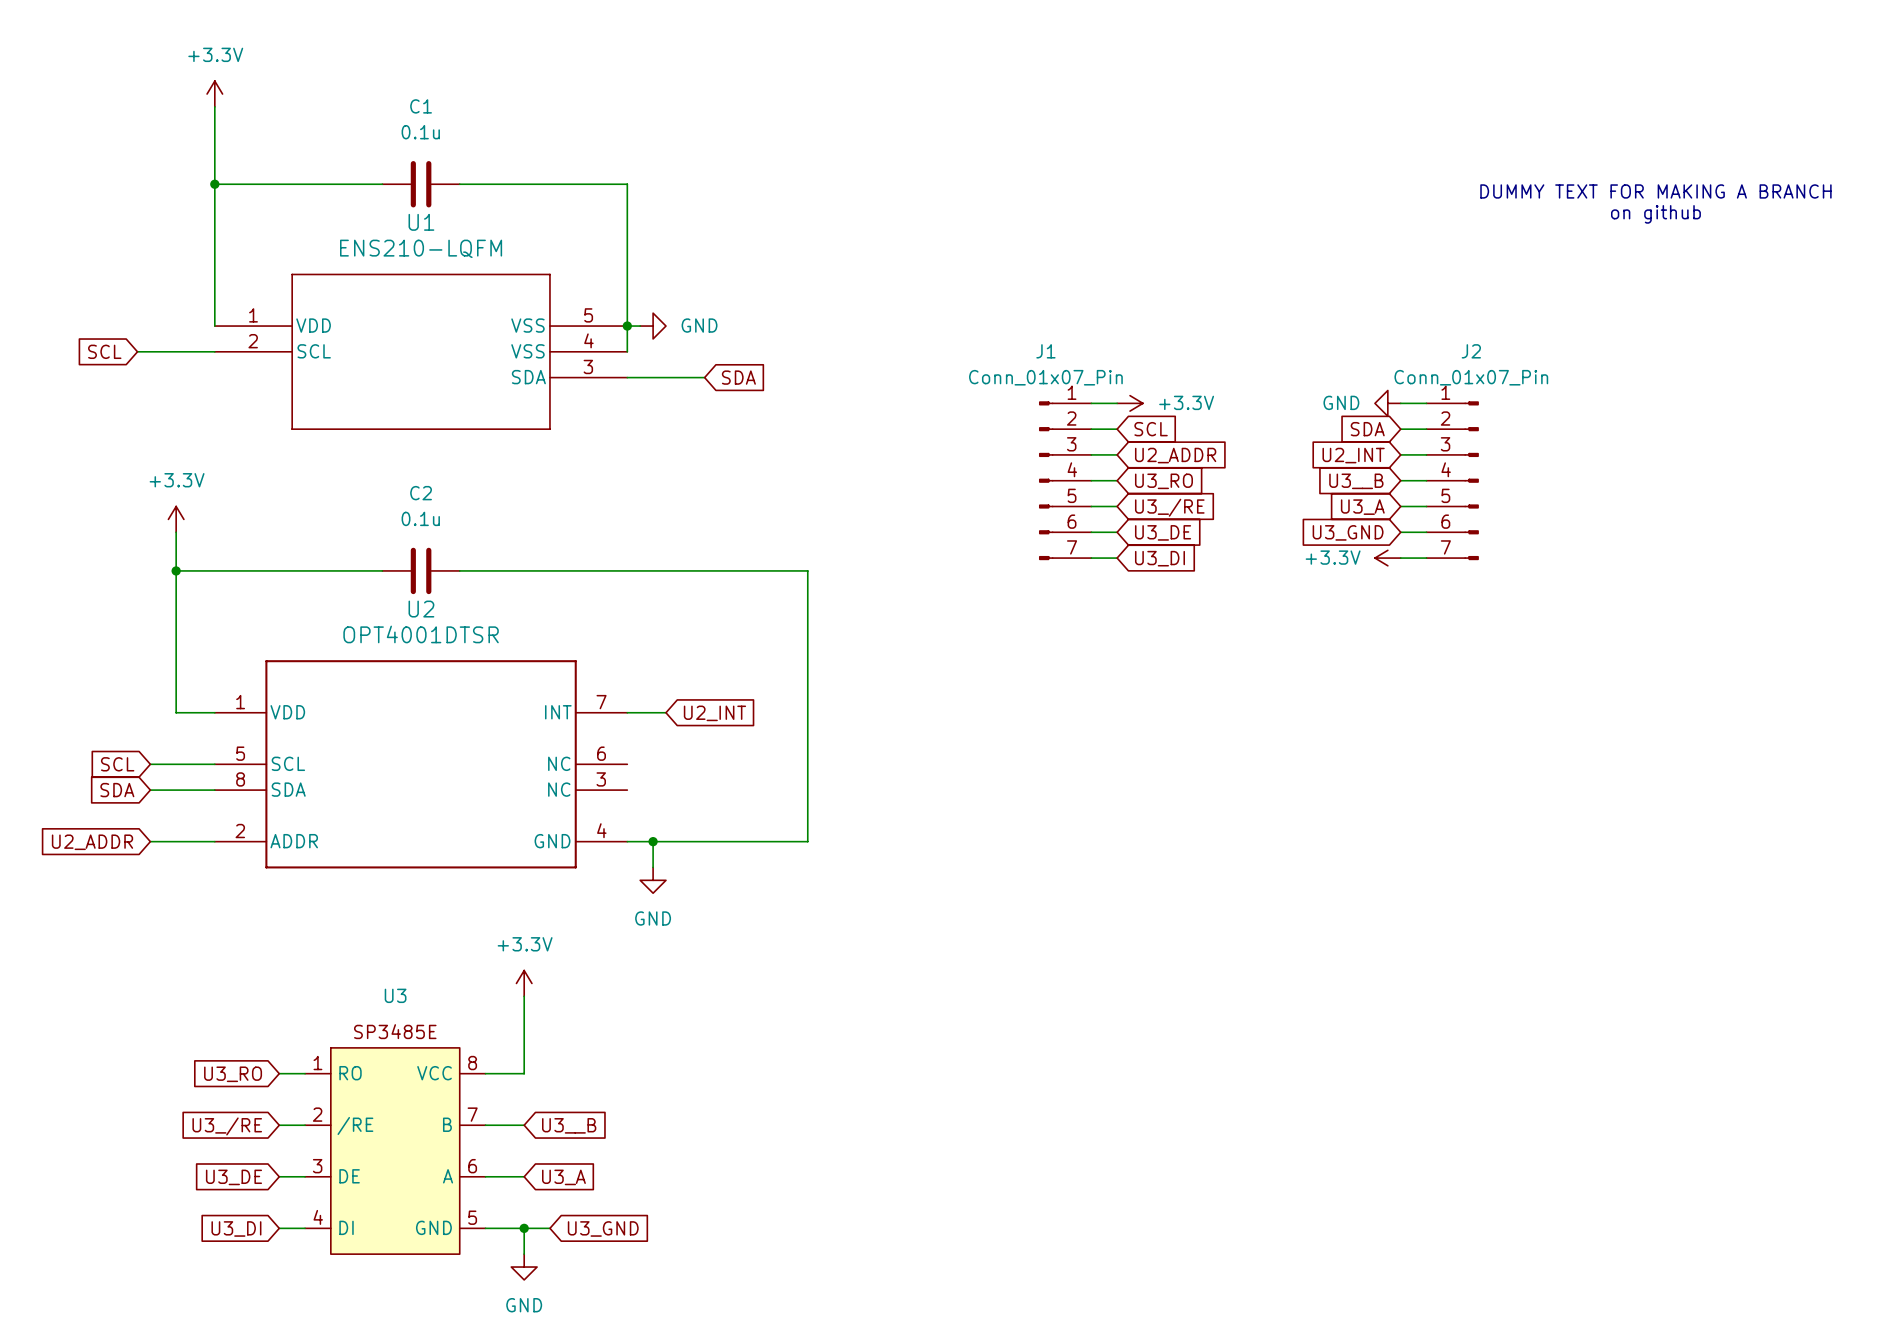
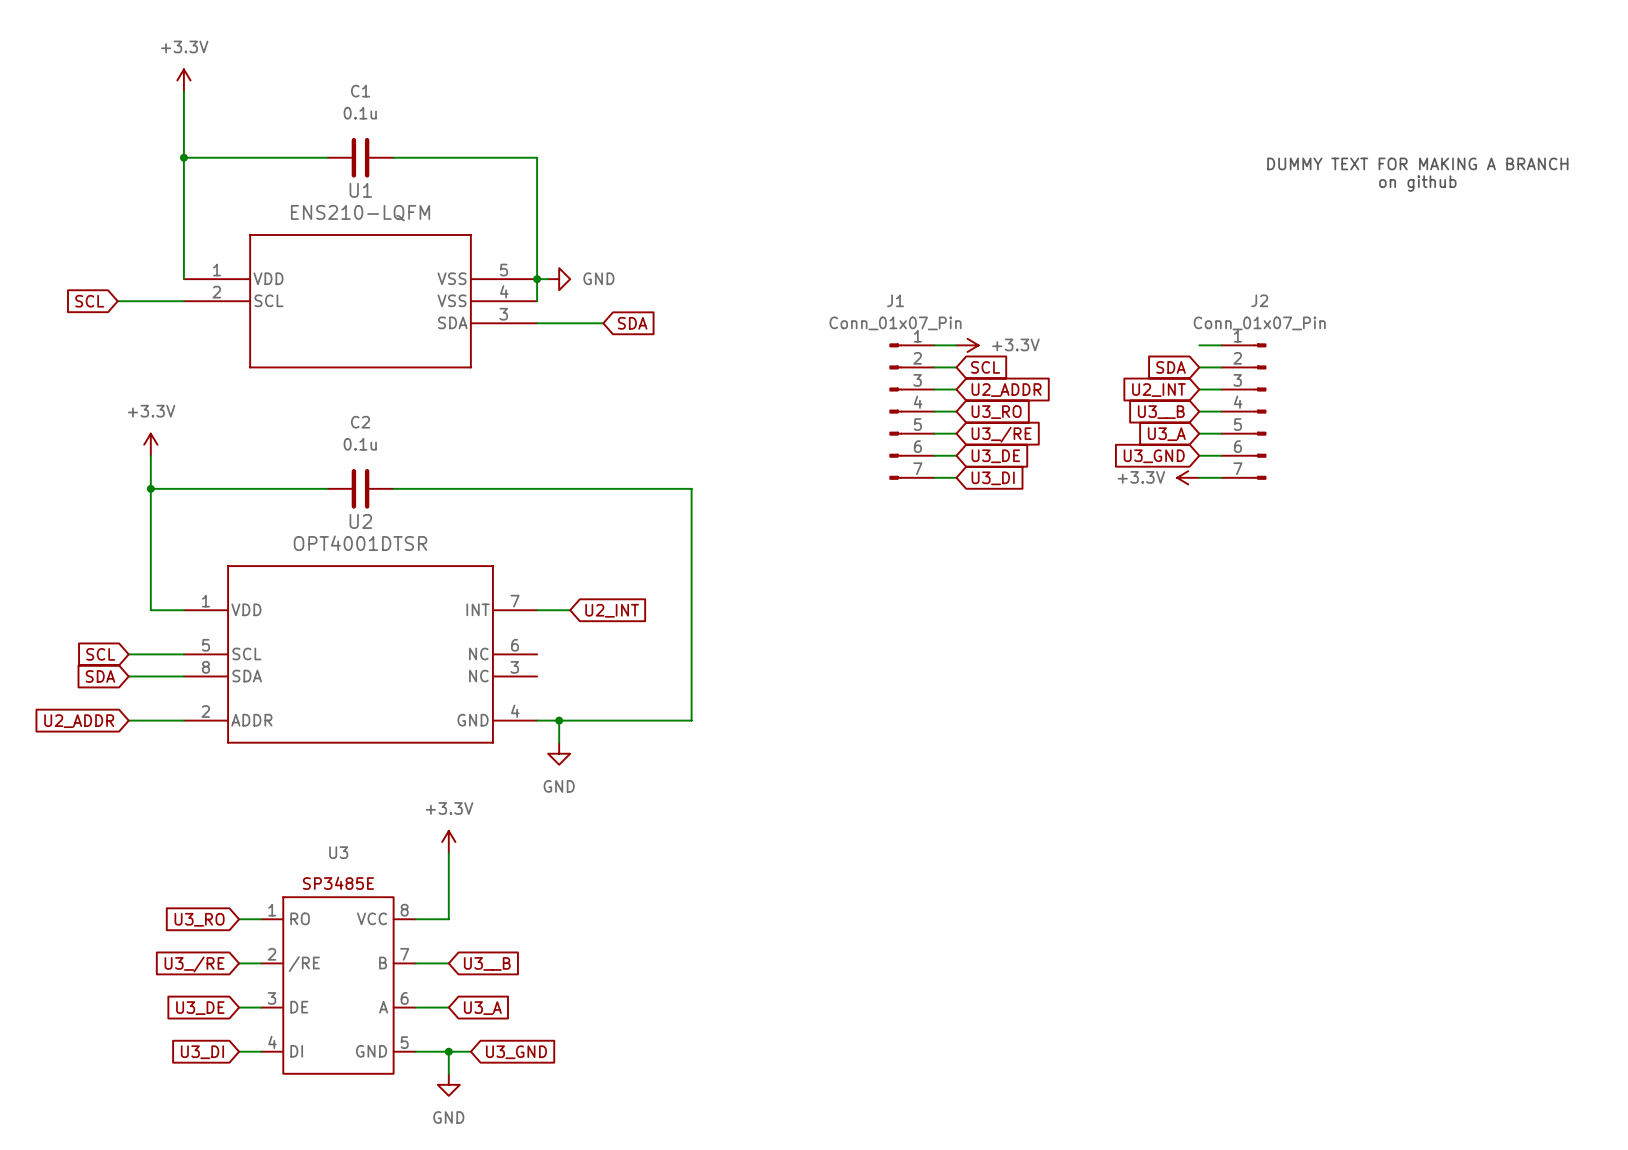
power symbol: GND (1387, 403) -> none

